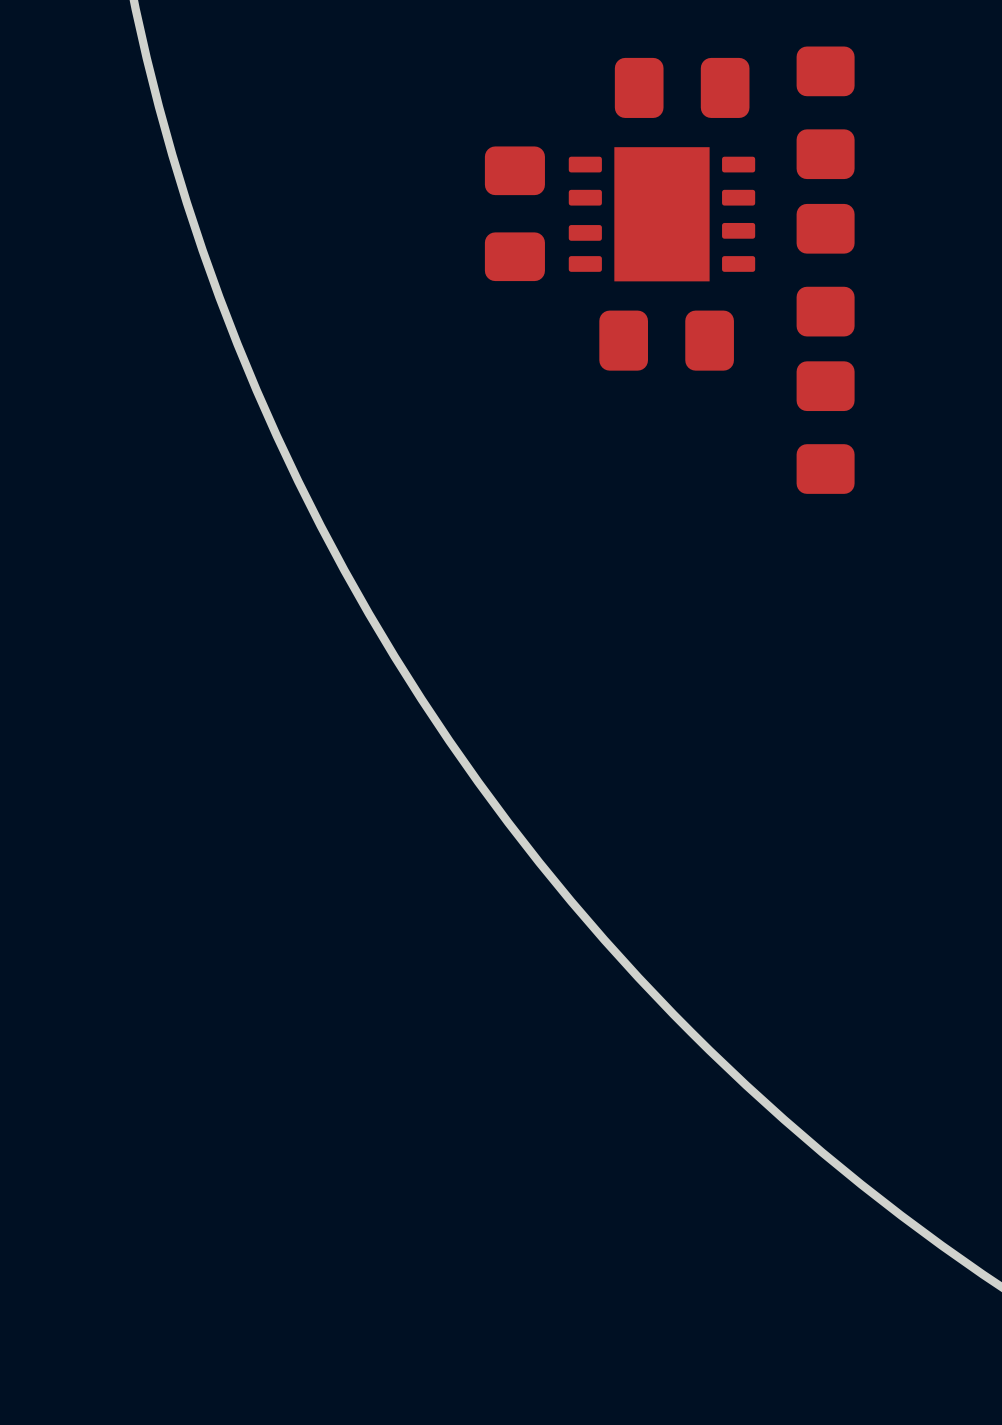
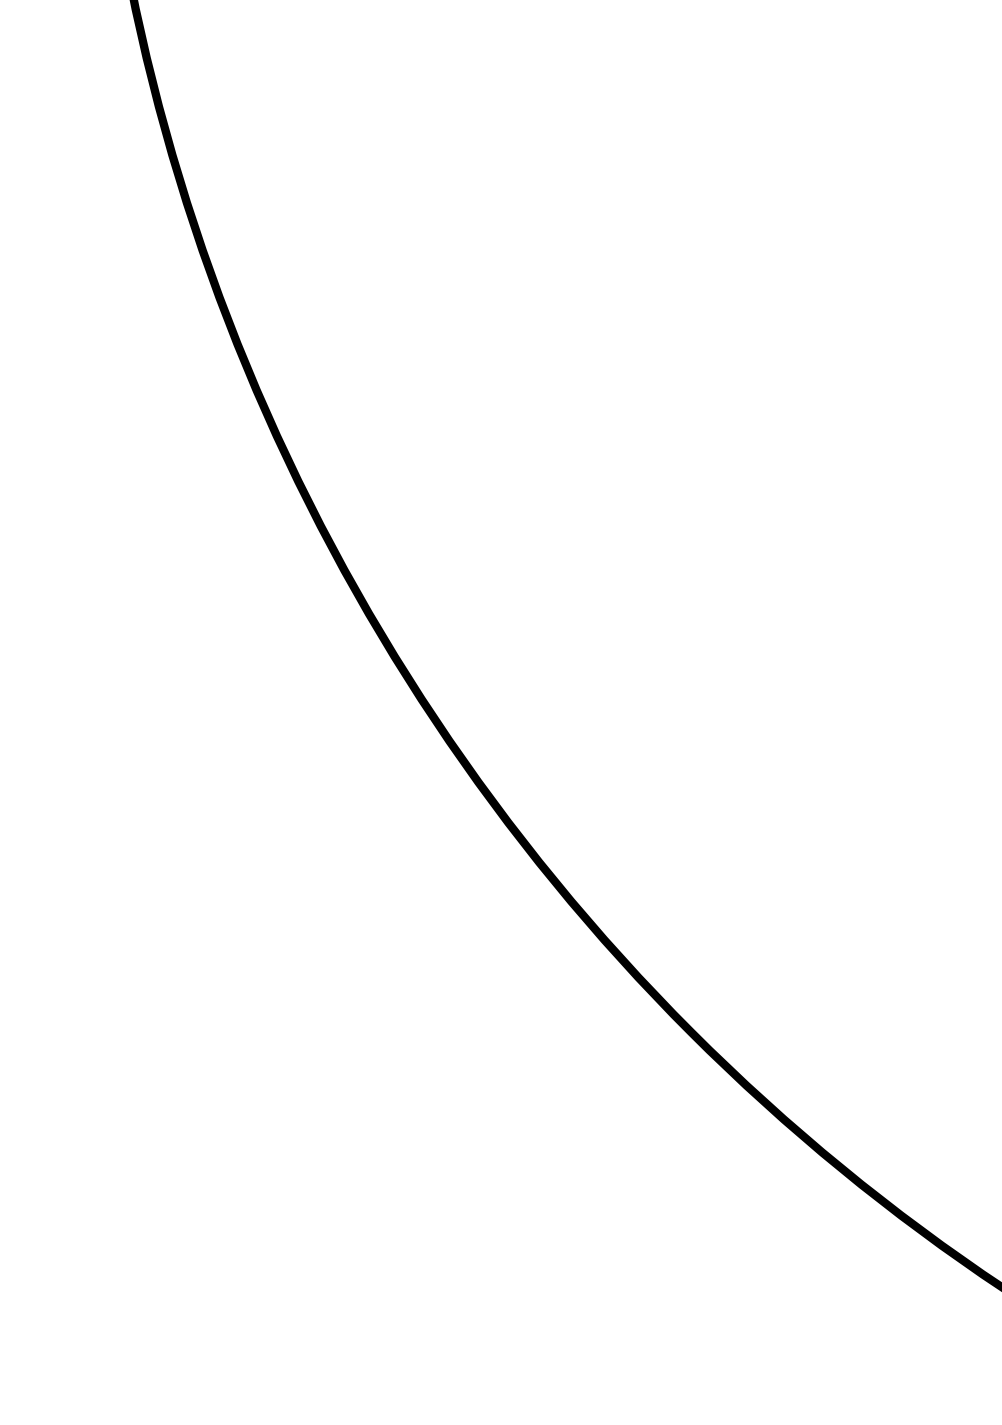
part: (682, 87) -> none
part: (825, 112) -> none
part: (514, 213) -> none
part: (661, 214) -> none
part: (825, 270) -> none
part: (666, 340) -> none
part: (825, 427) -> none

